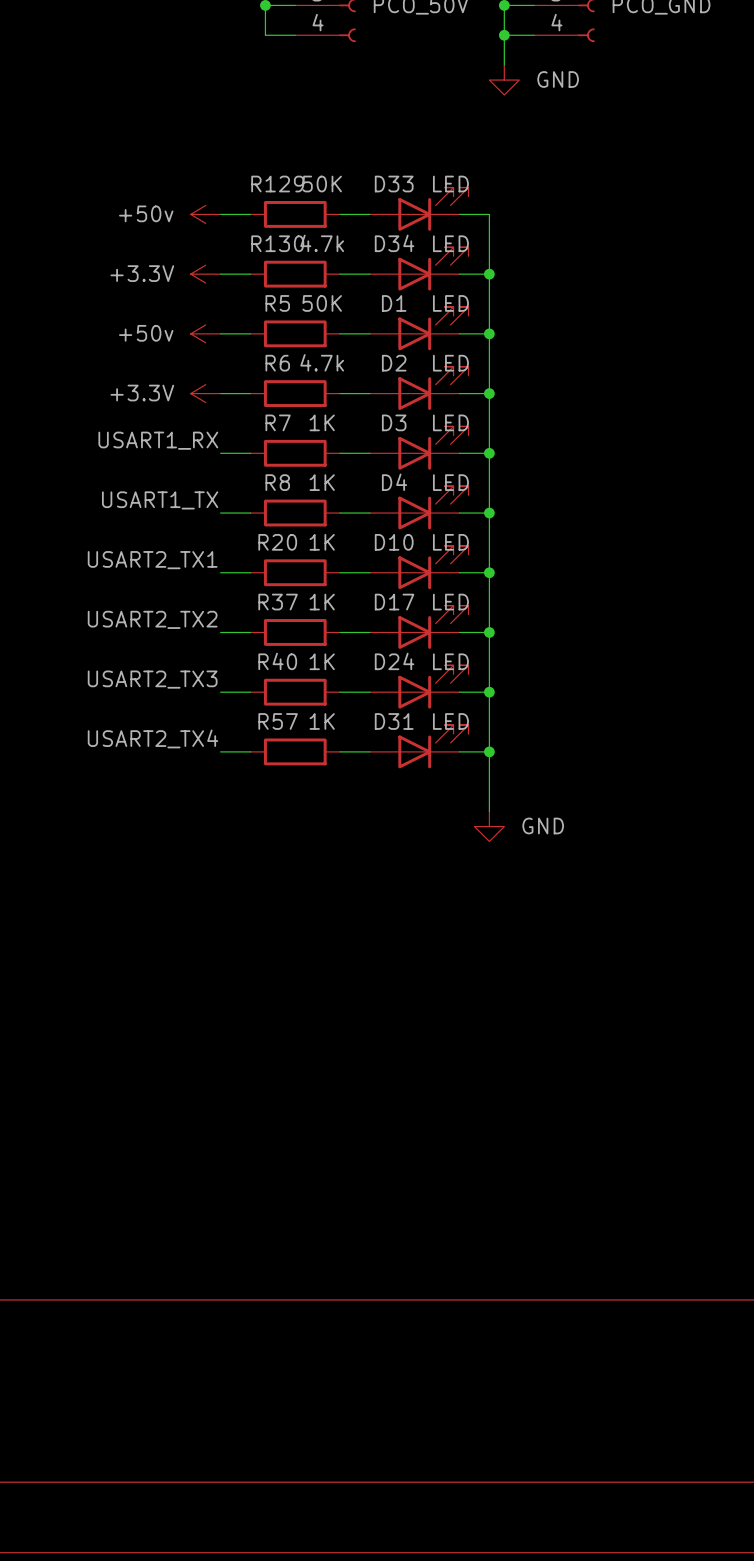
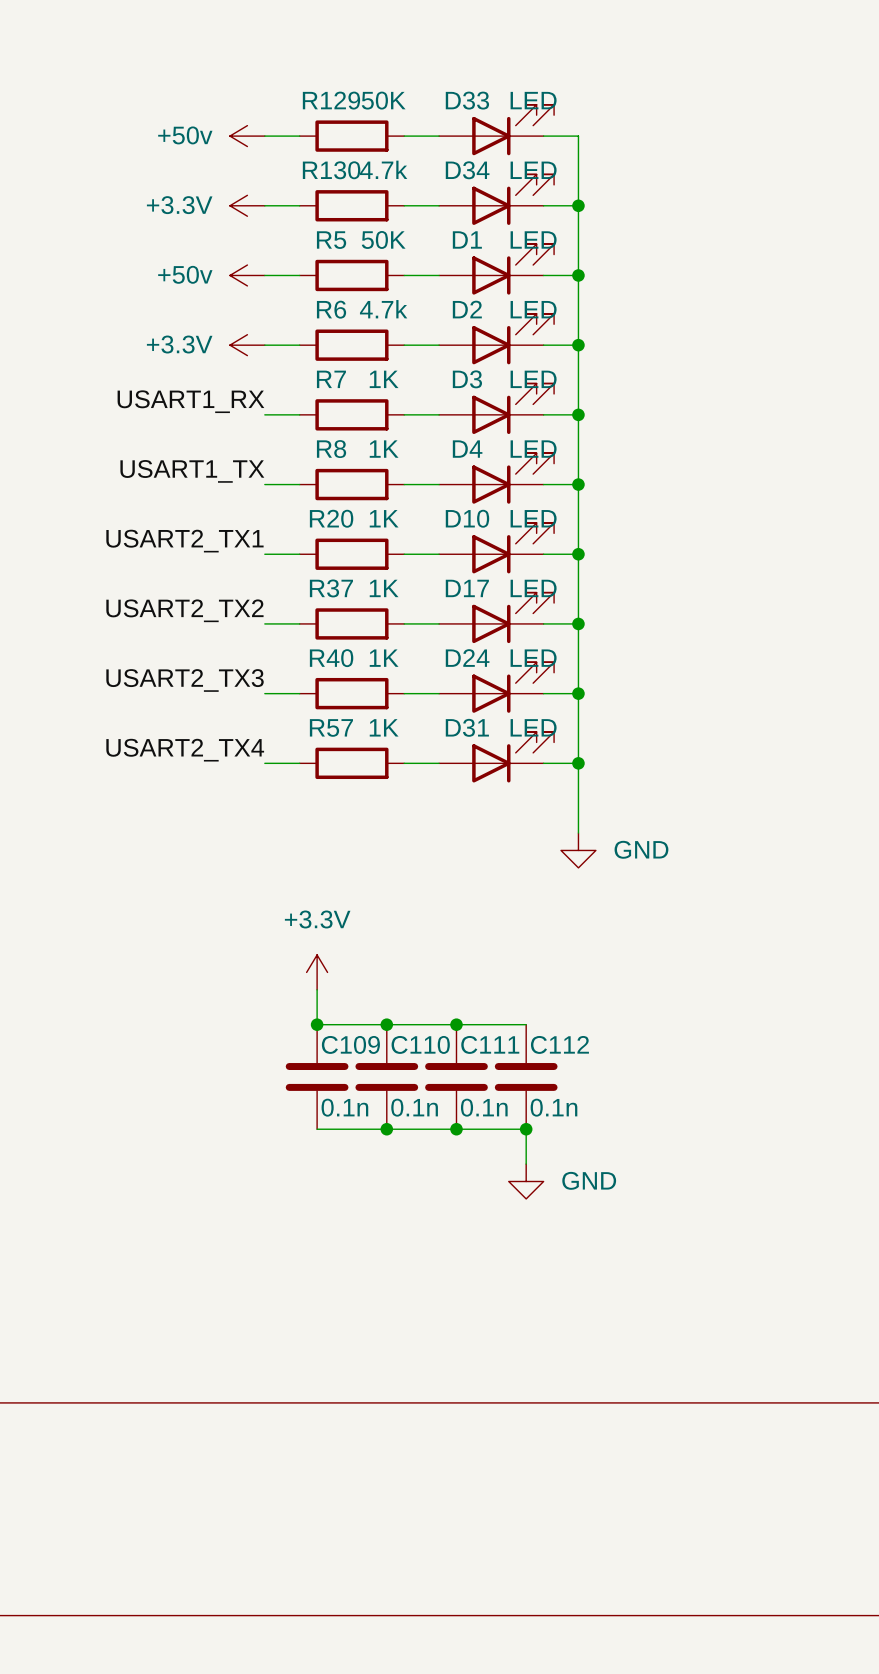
power symbol: none -> +3.3V (317, 972)
wire: none -> (317, 989) (317, 1024) (526, 1024)
junction: none -> (317, 1024)
junction: none -> (386, 1024)
junction: none -> (456, 1024)
C109: none -> 0.1n (317, 1076)
C110: none -> 0.1n (386, 1076)
C111: none -> 0.1n (456, 1076)
C112: none -> 0.1n (526, 1076)
wire: none -> (317, 1129) (526, 1129) (526, 1164)
junction: none -> (386, 1129)
junction: none -> (456, 1129)
junction: none -> (526, 1129)
power symbol: none -> GND (526, 1181)

